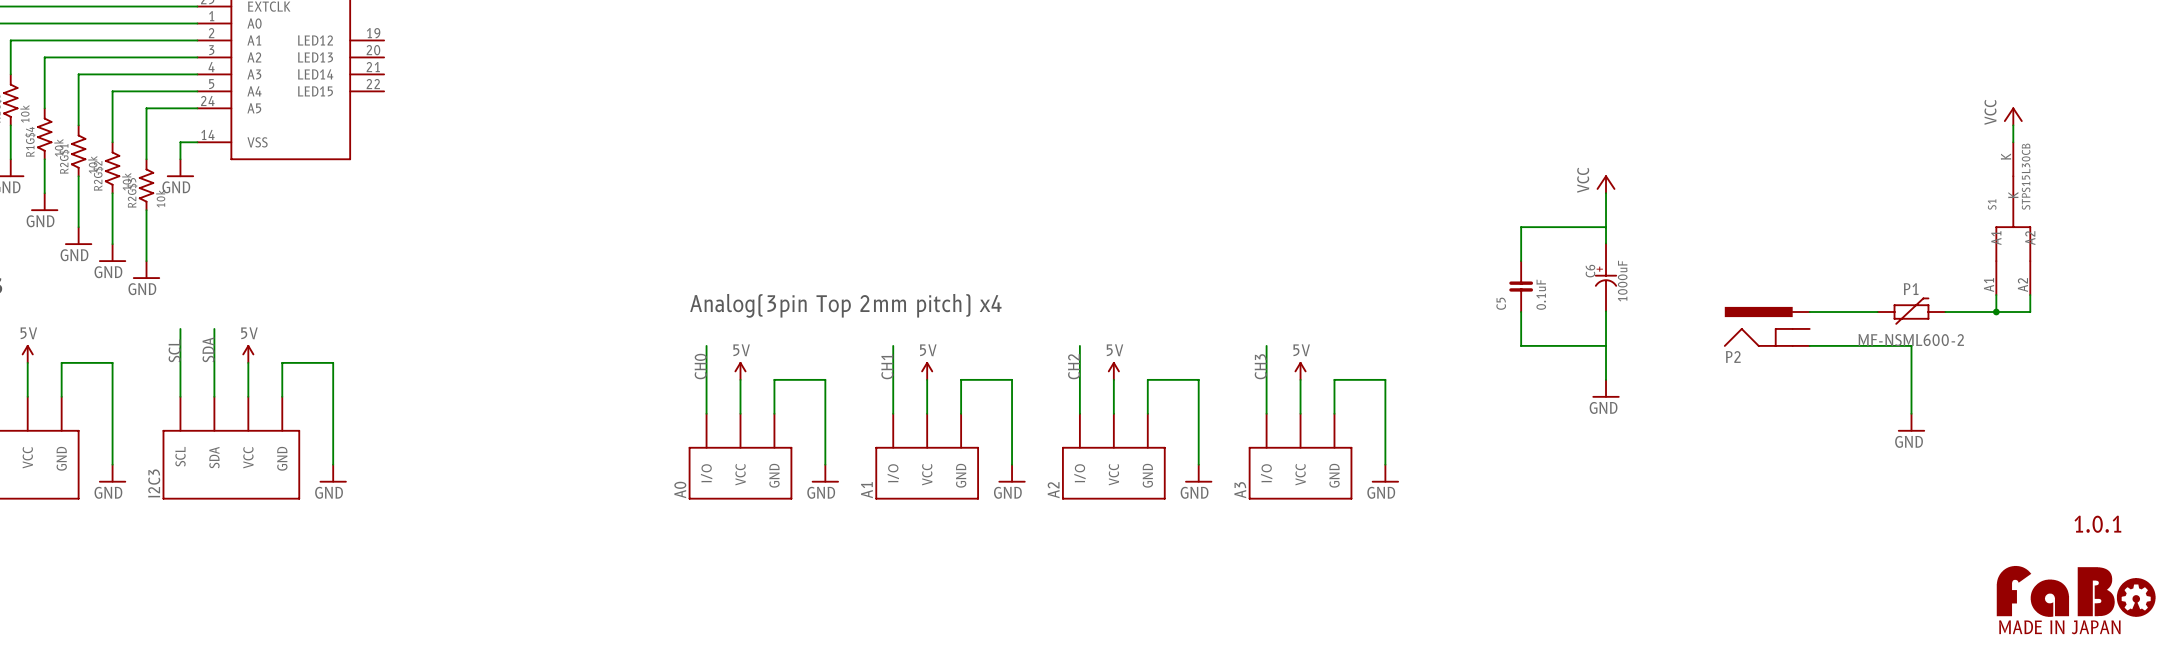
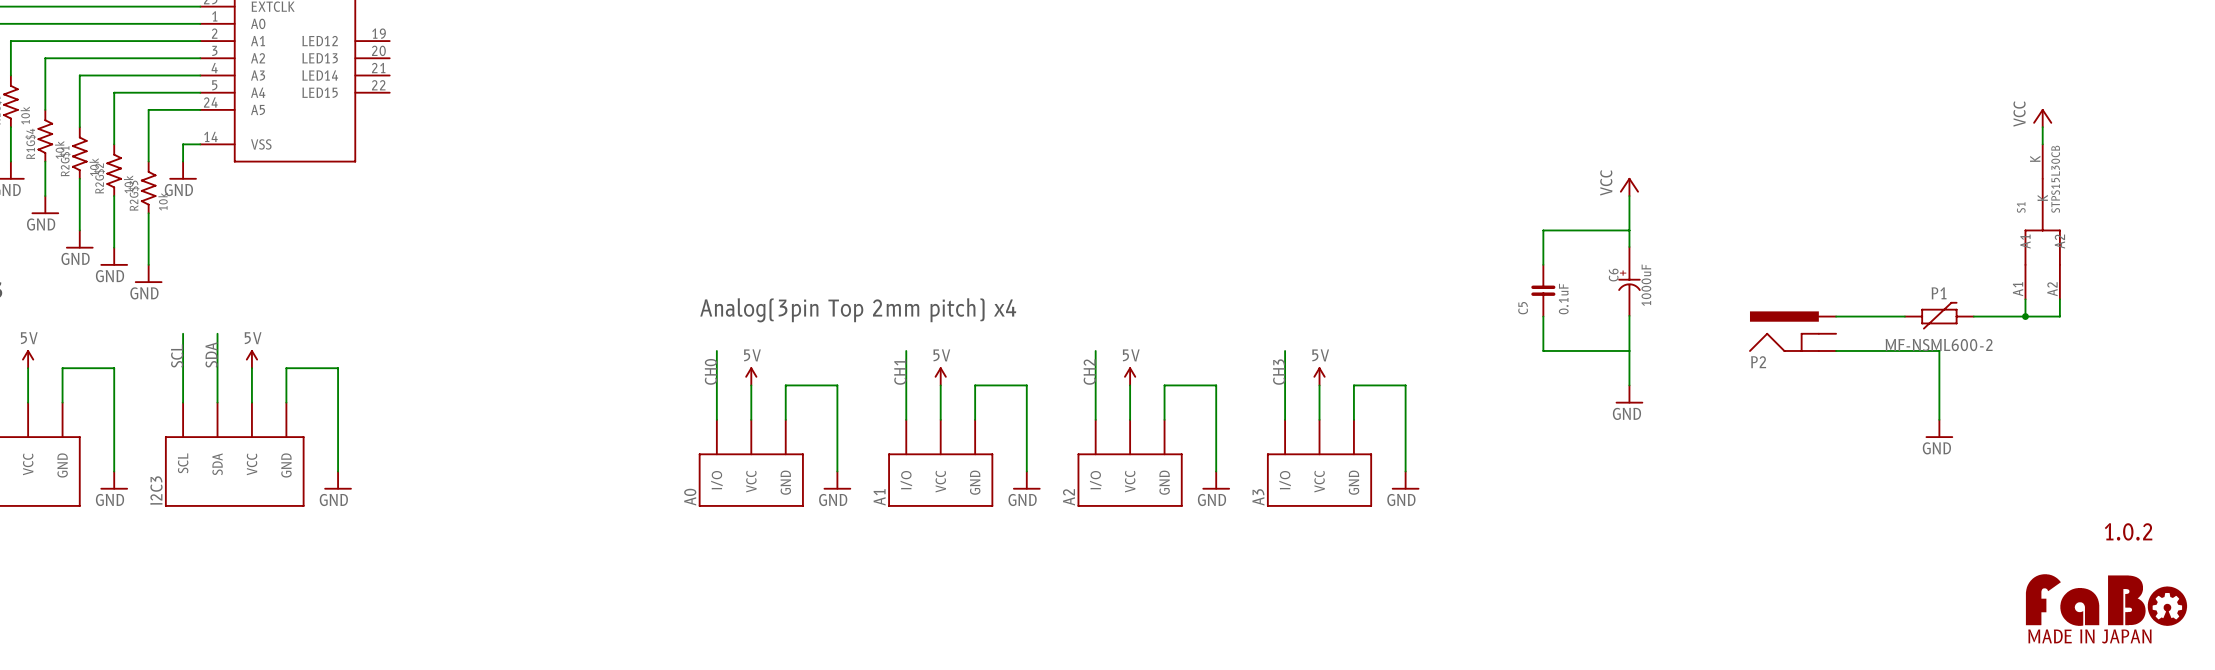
text: 1.0.1 (2097, 524) -> 1.0.2 (2128, 531)

